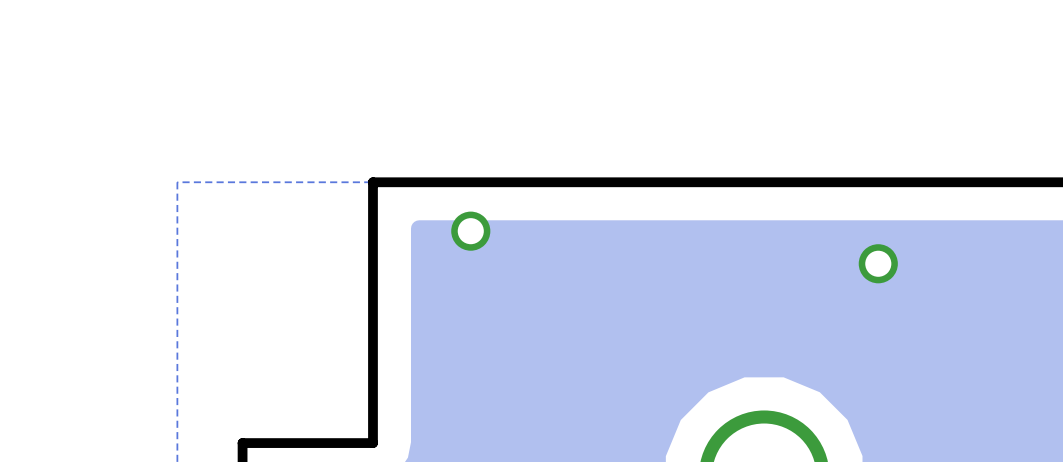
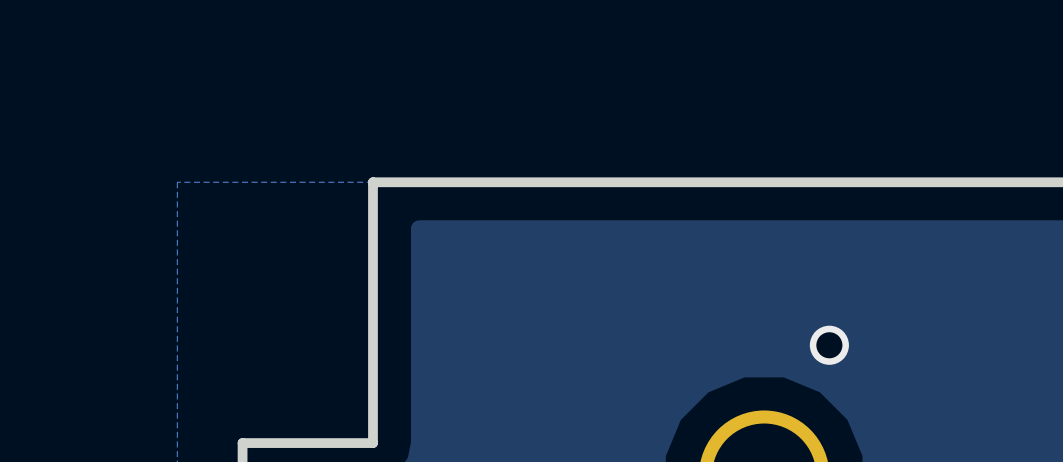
via: (470, 231) -> none
via position: (878, 263) -> (829, 345)

